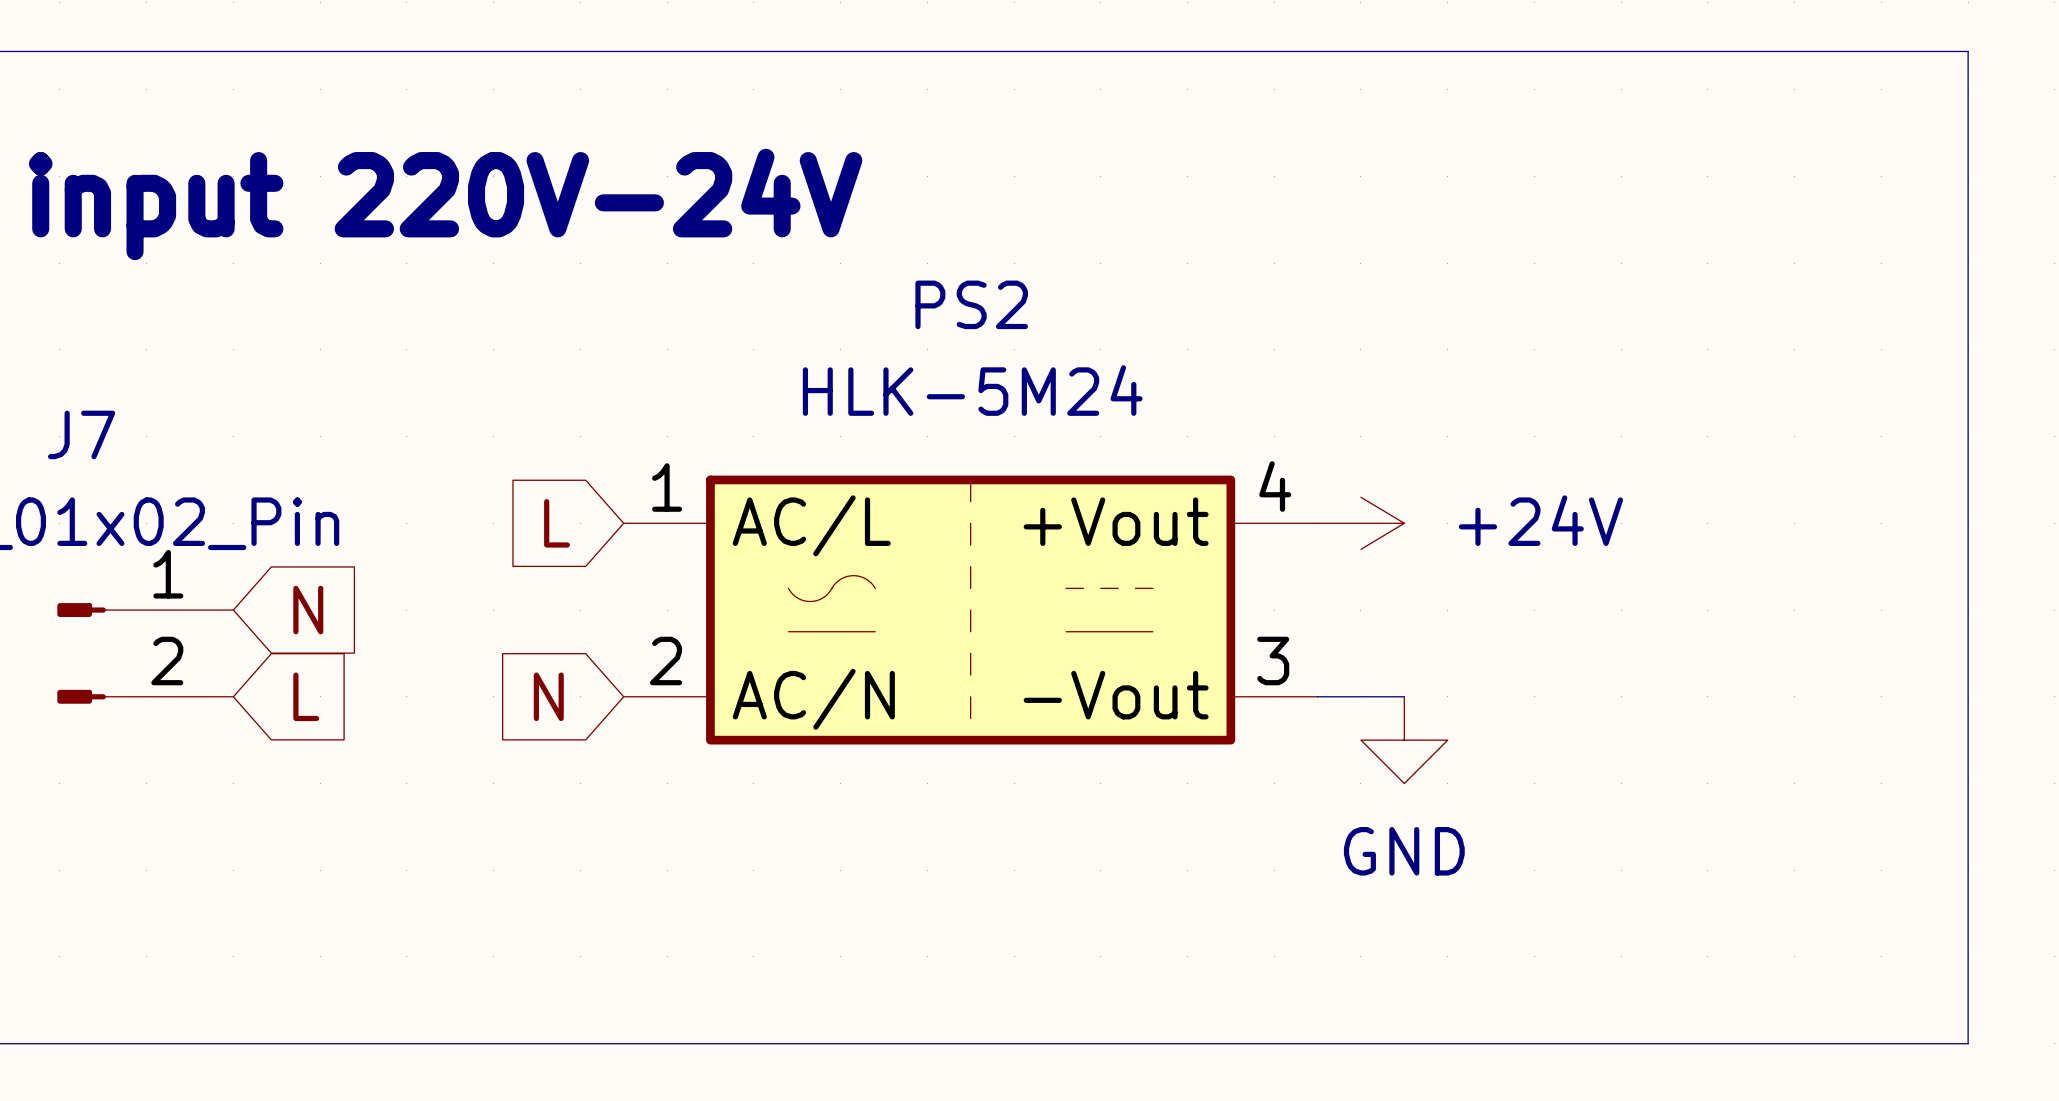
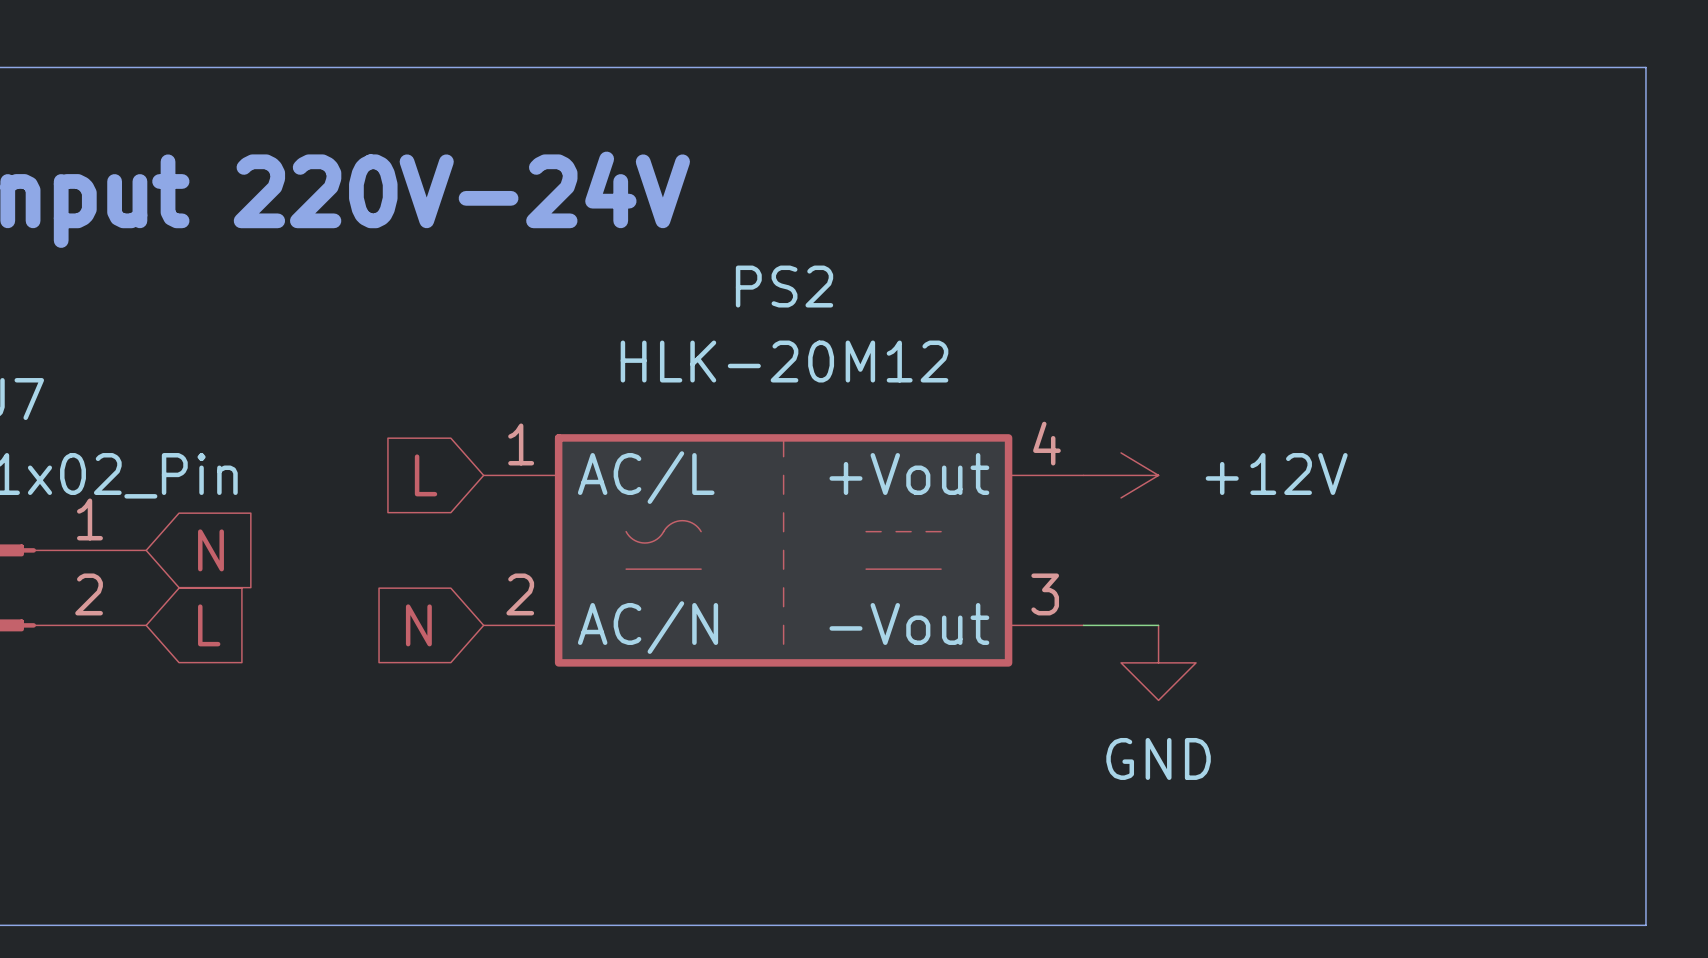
PS2 value: HLK-5M24 (972, 390) -> HLK-20M12 (784, 361)
power symbol: +24V (1360, 523) -> +12V (1121, 475)

